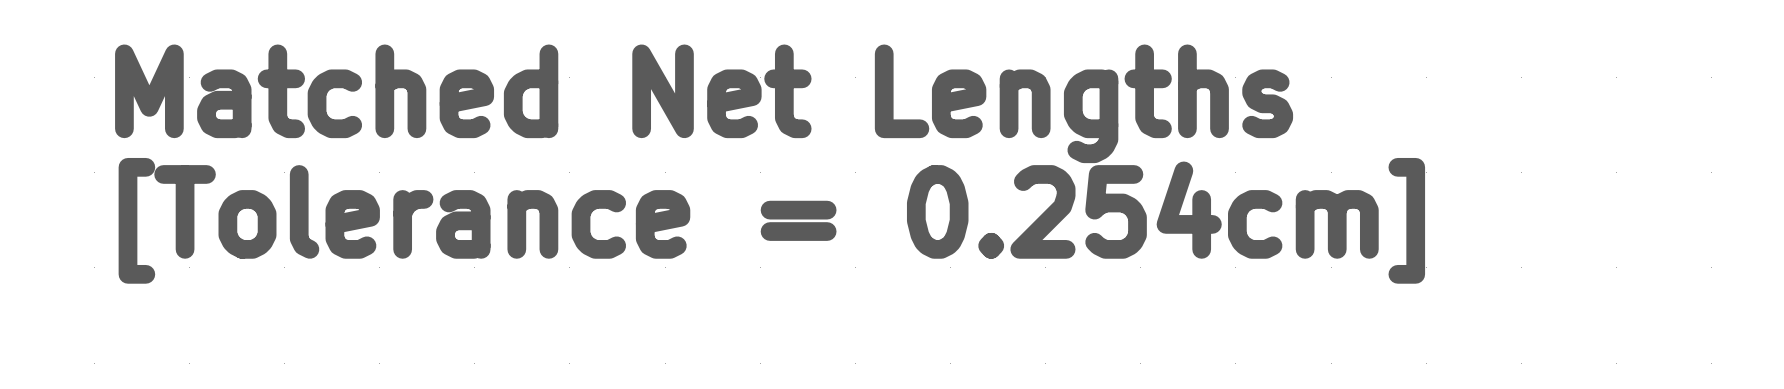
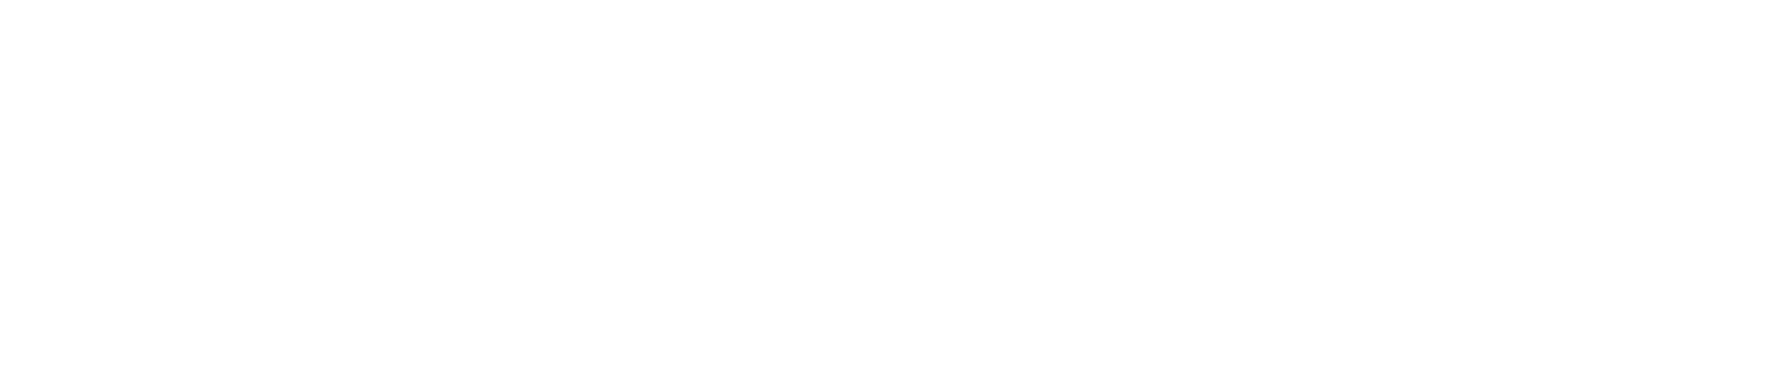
text: Matched Net Lengths (704, 103) -> none
text: [Tolerance = 0.254cm] (771, 220) -> none

